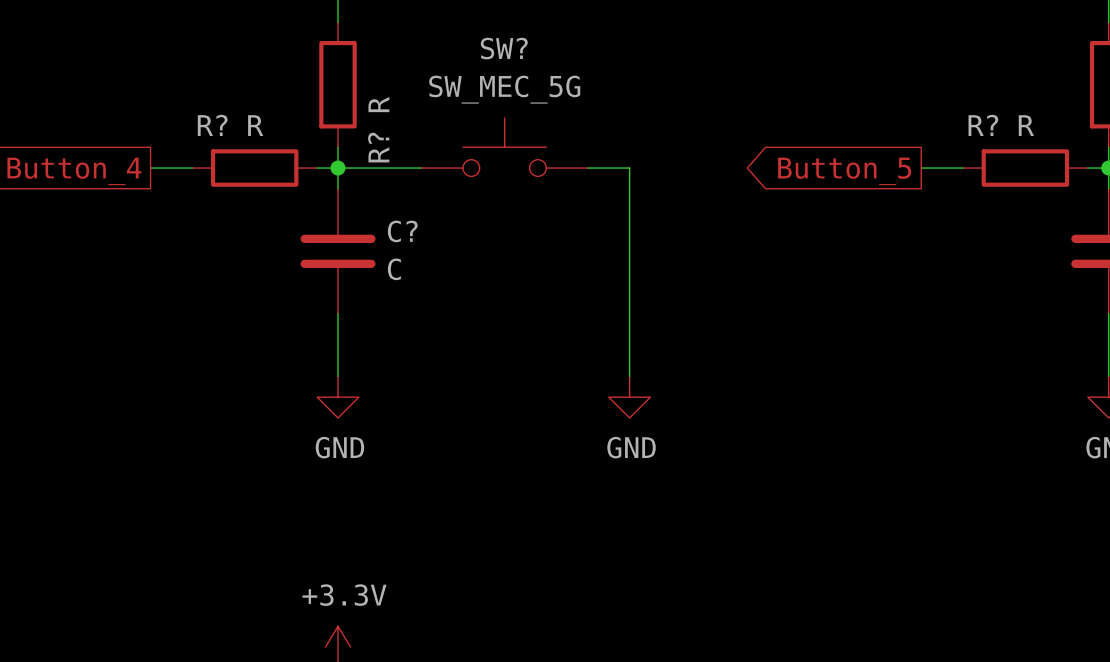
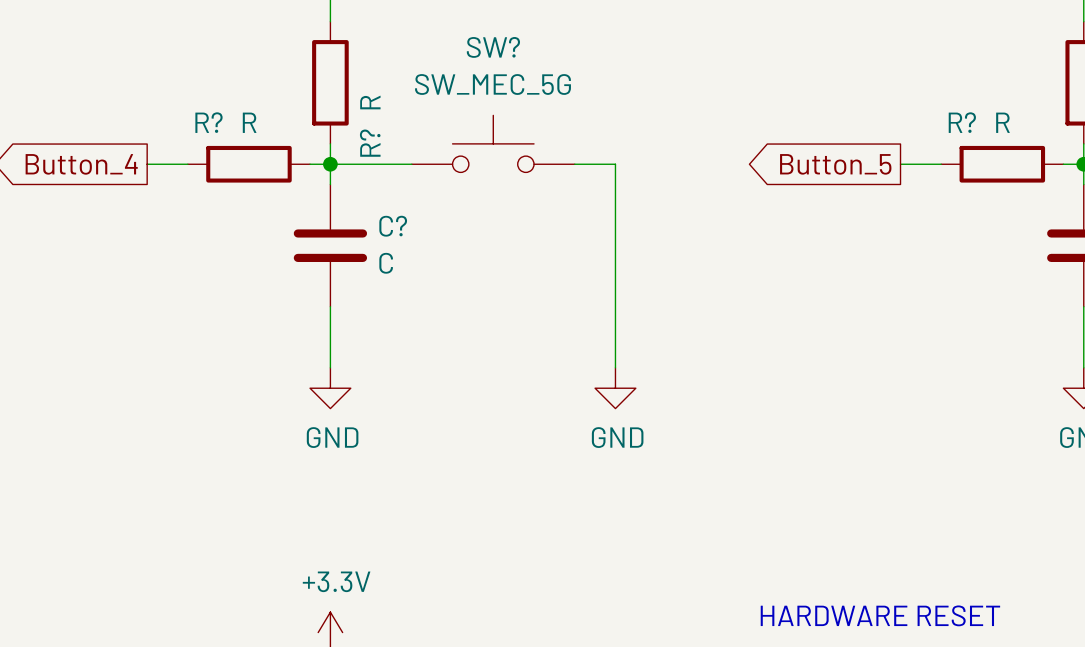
text: none -> HARDWARE RESET (880, 615)

